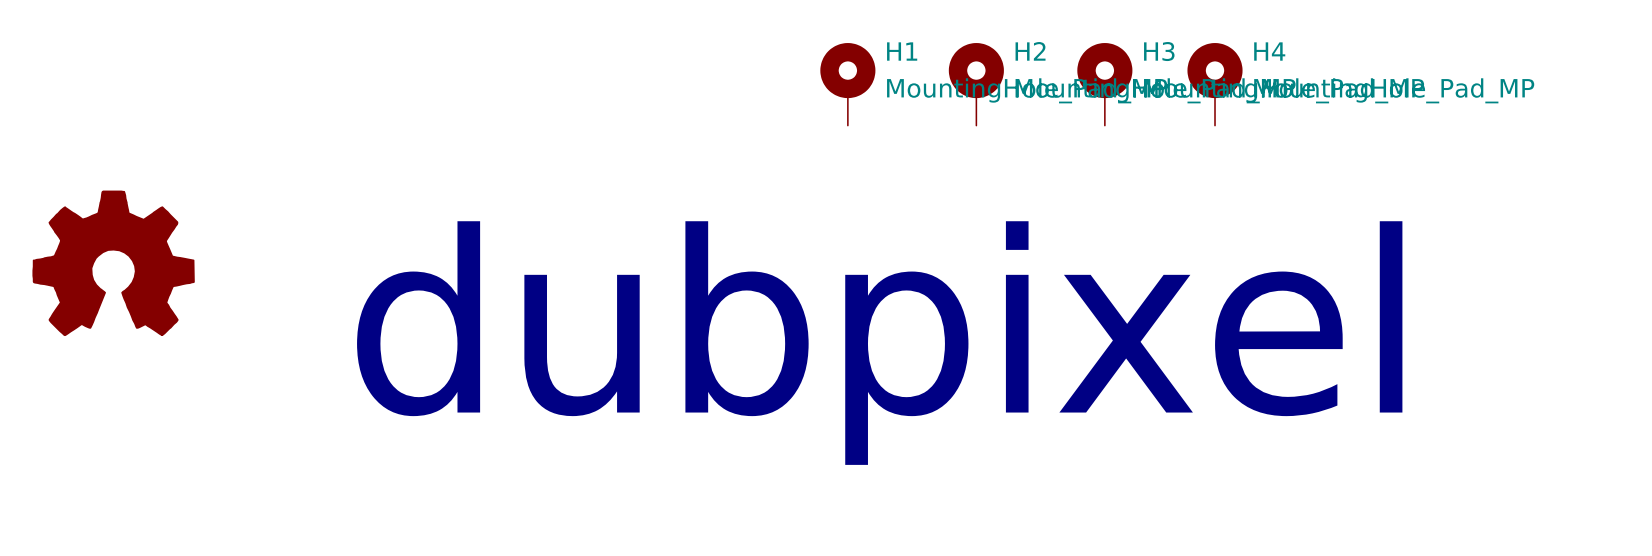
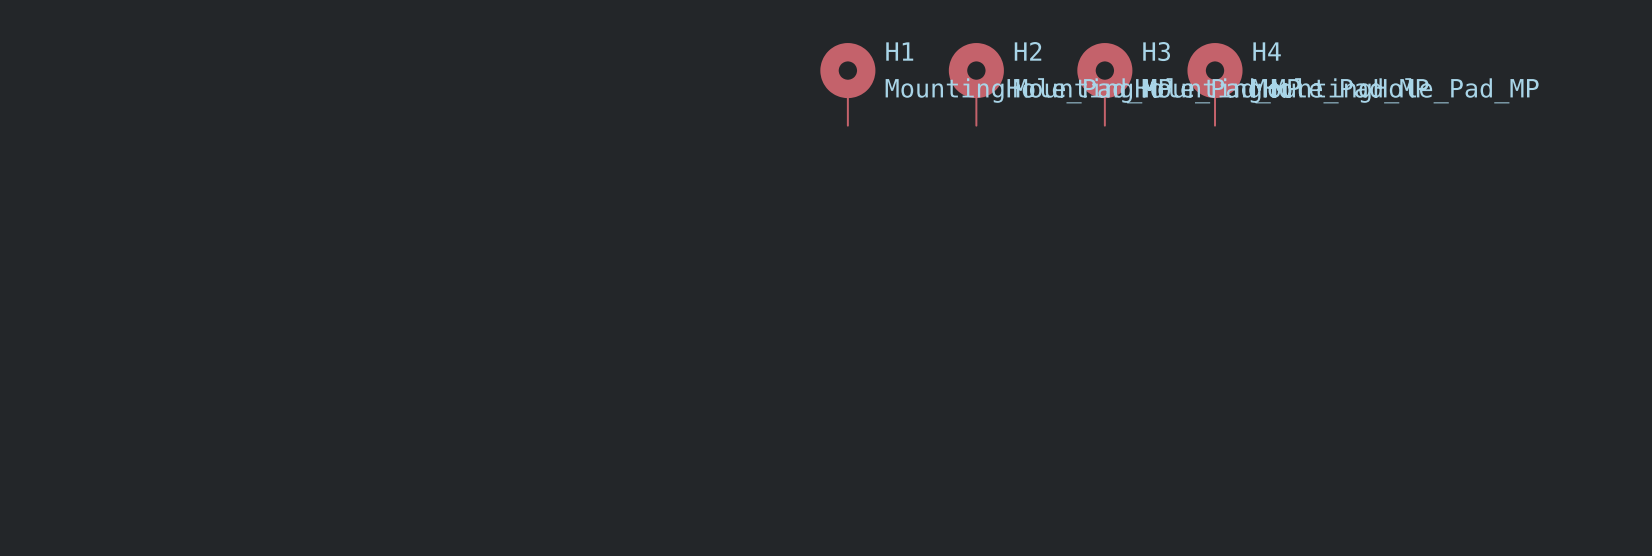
part: (113, 263) -> none
text: dubpixel (879, 343) -> none

